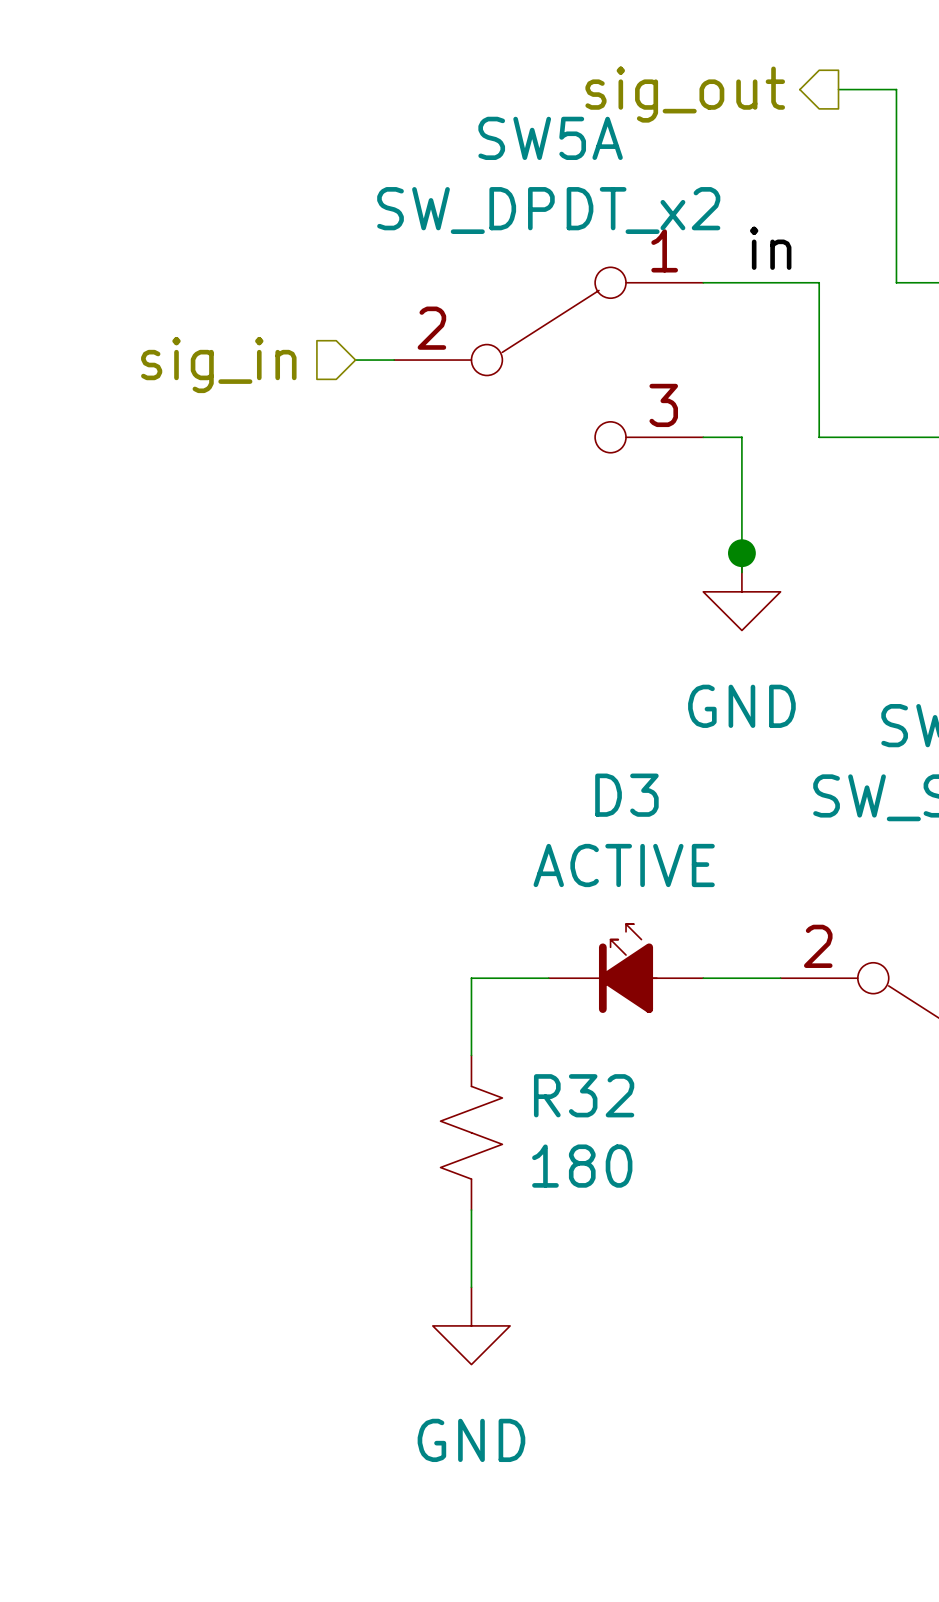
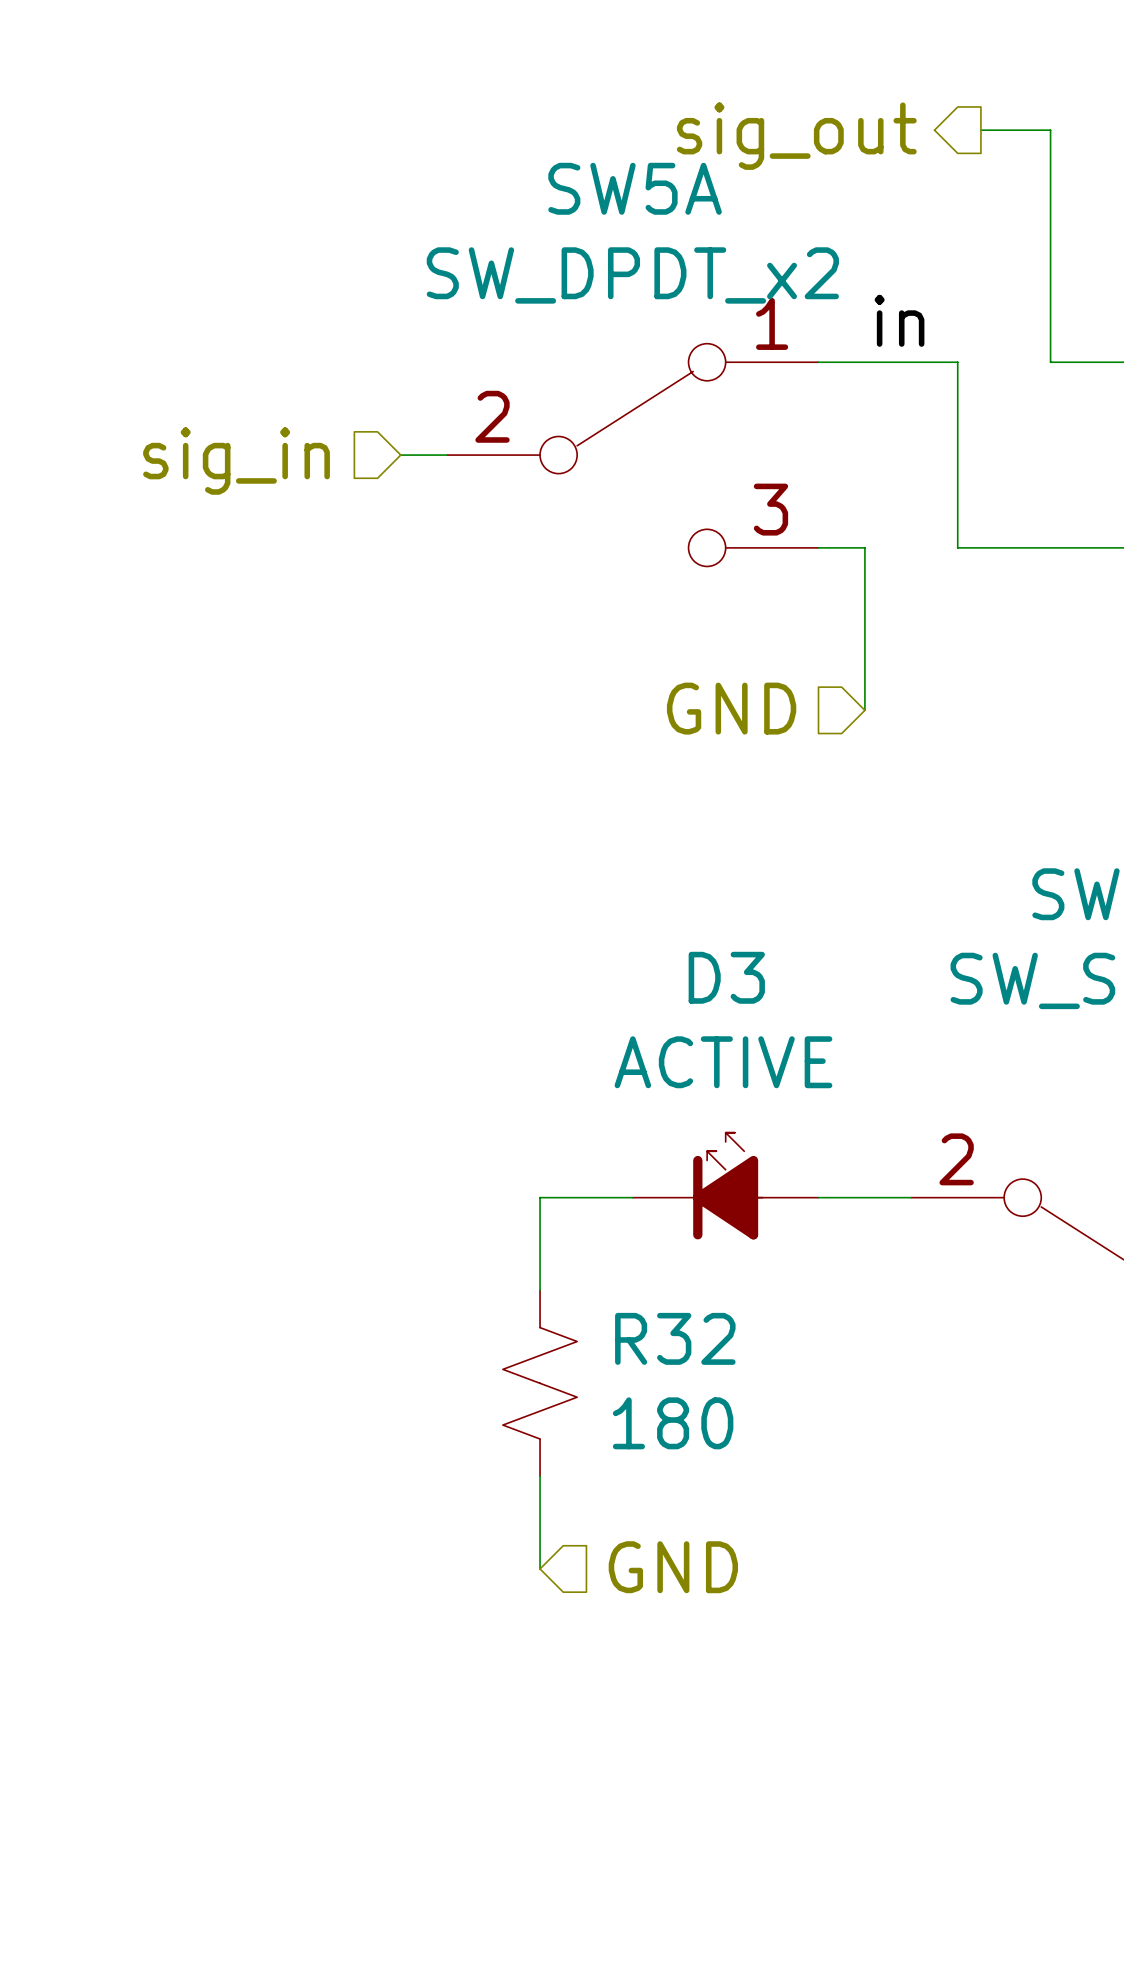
junction: (741, 553) -> none
hierarchical label: none -> GND (731, 708)
power symbol: GND (741, 591) -> none
hierarchical label: none -> GND (673, 1567)
power symbol: GND (471, 1325) -> none

